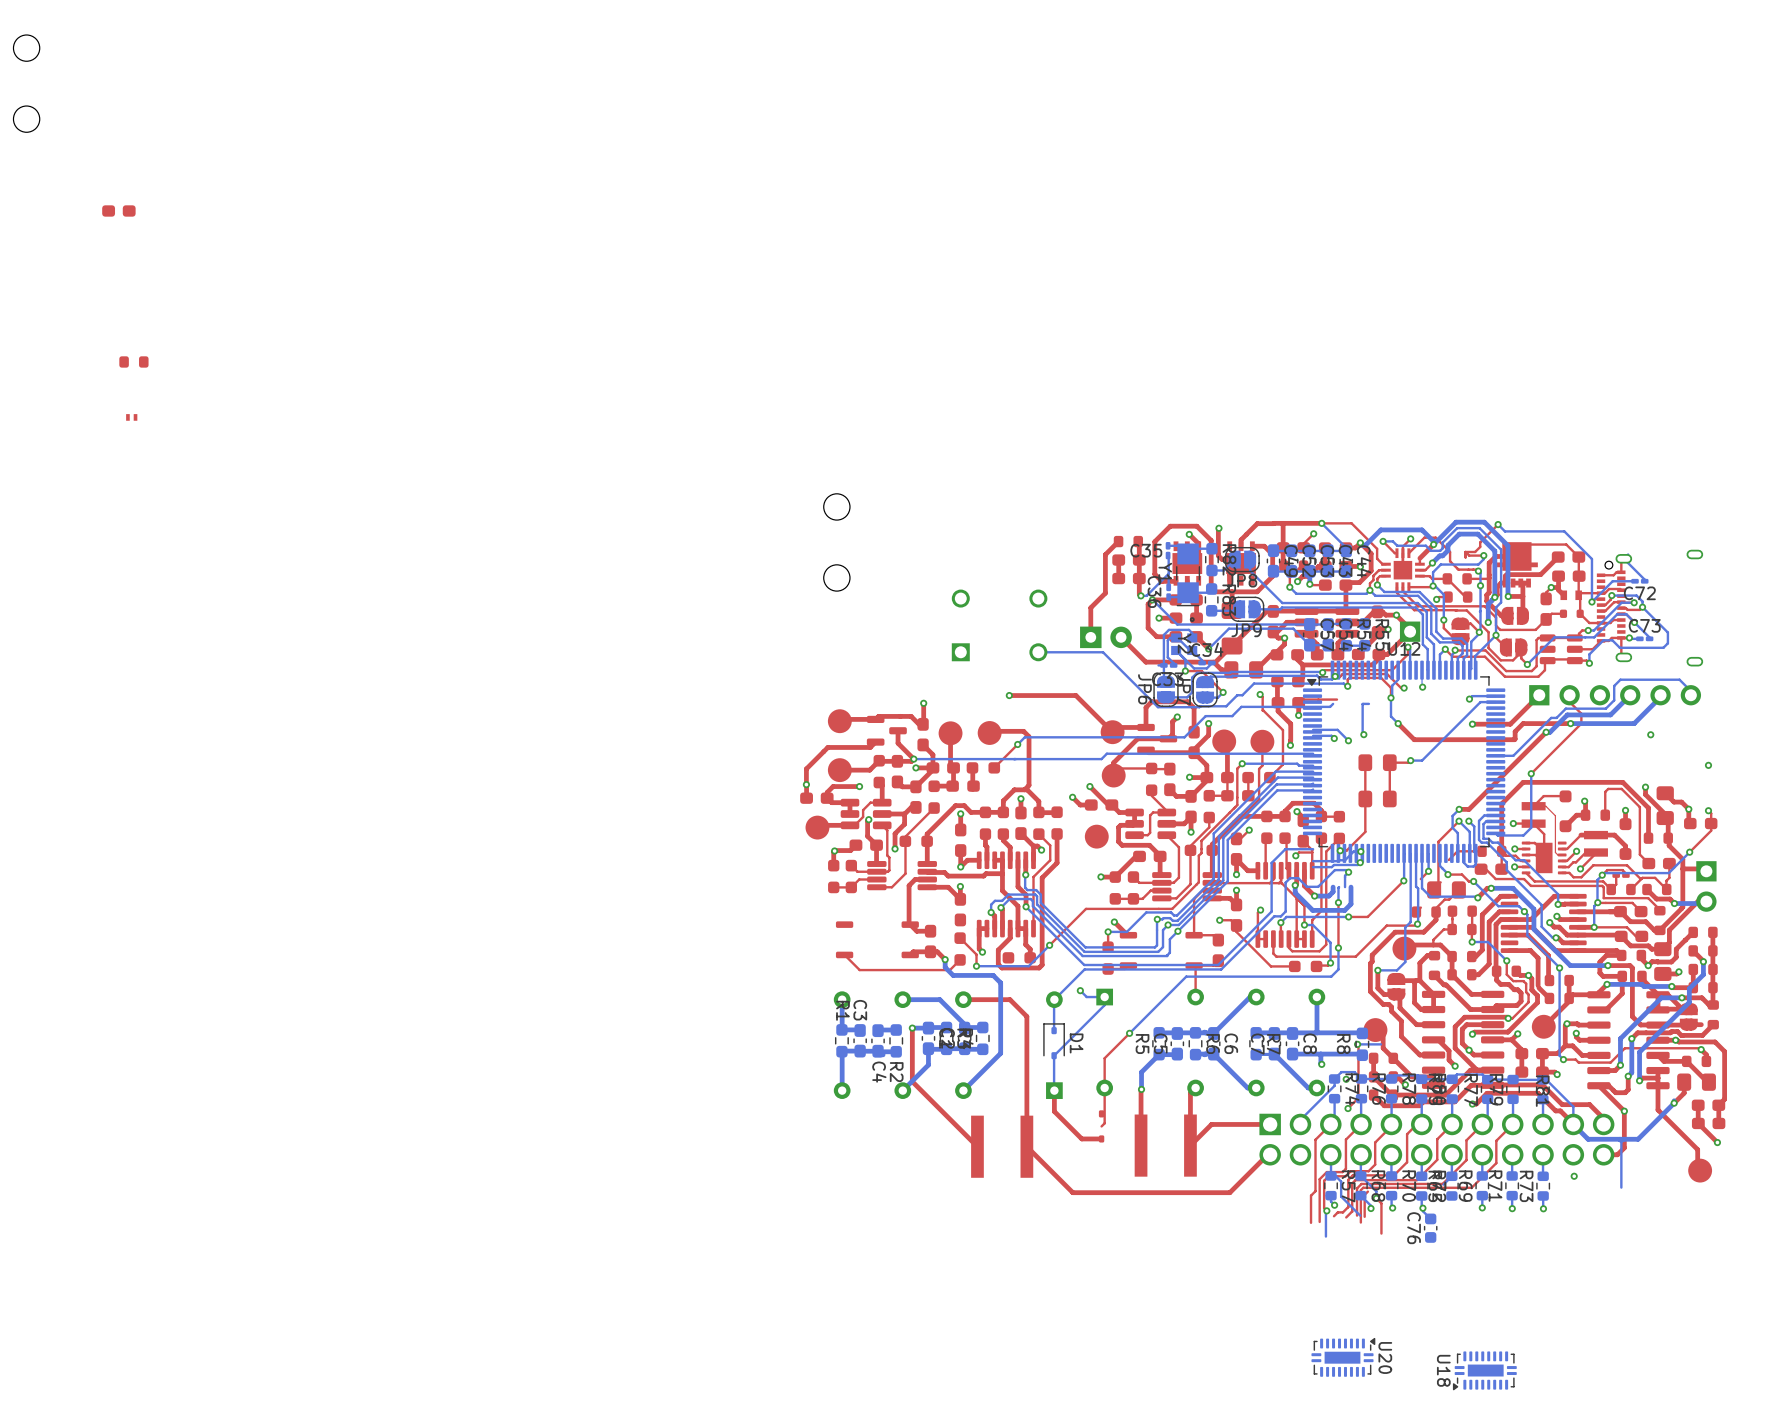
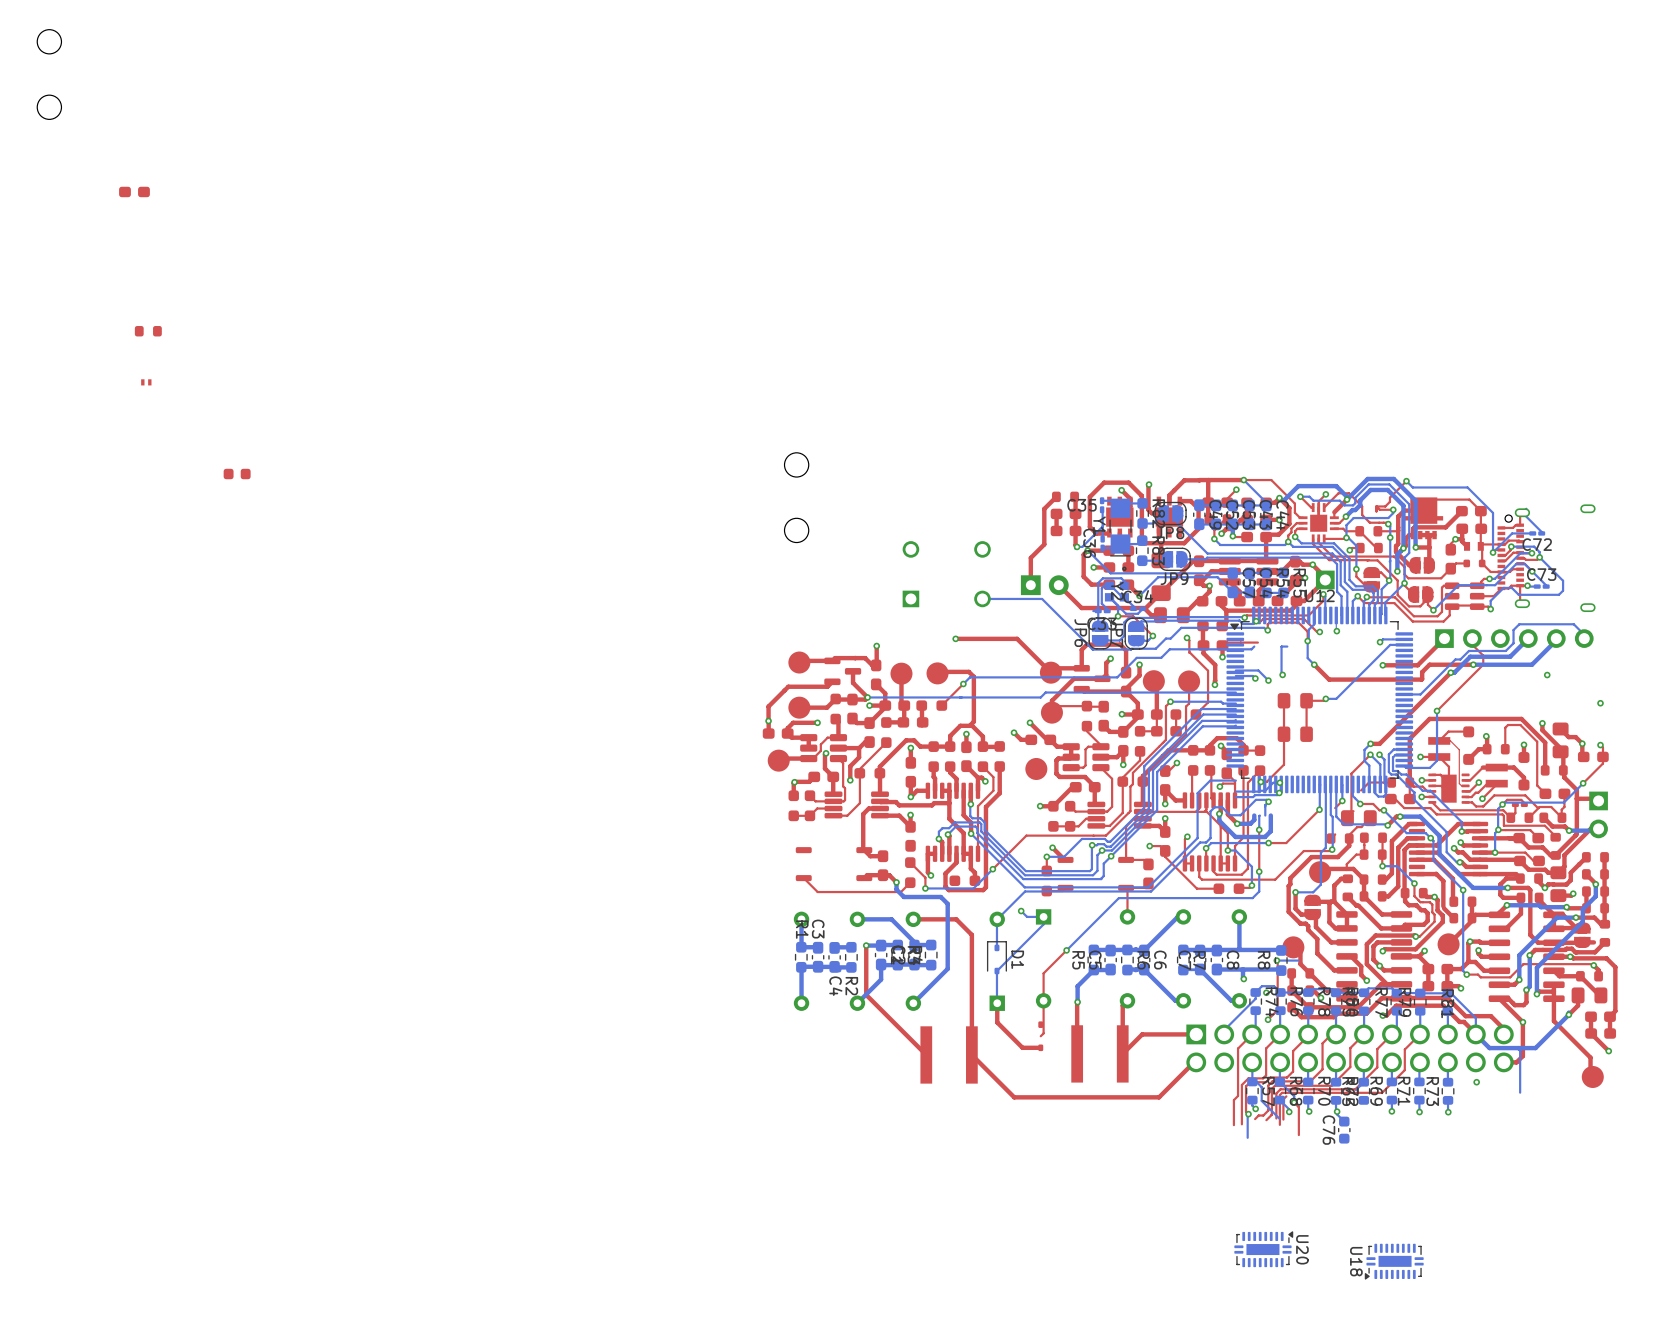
part: none -> (237, 474)

